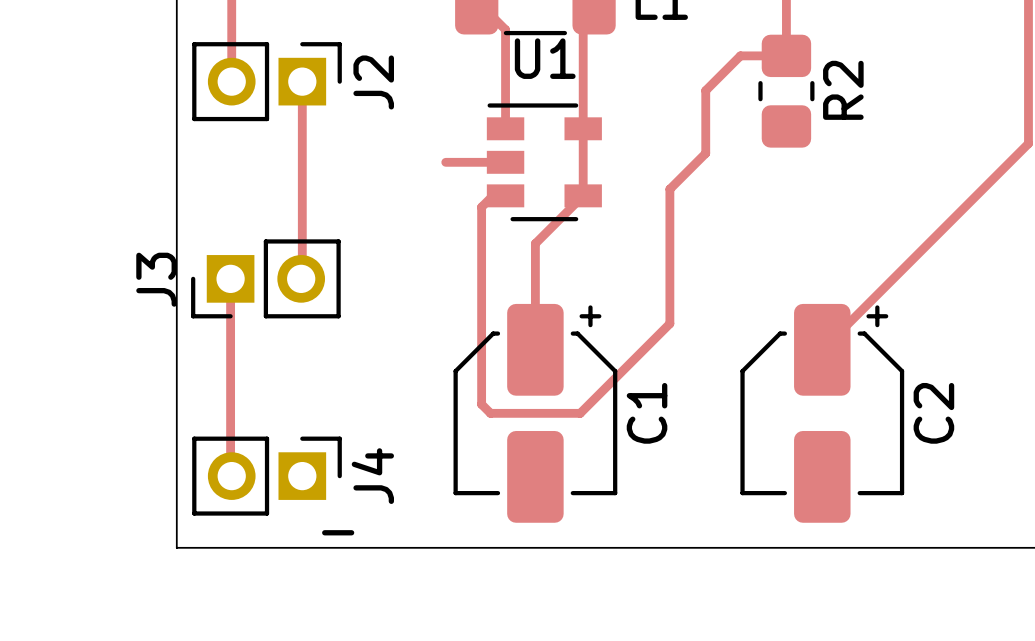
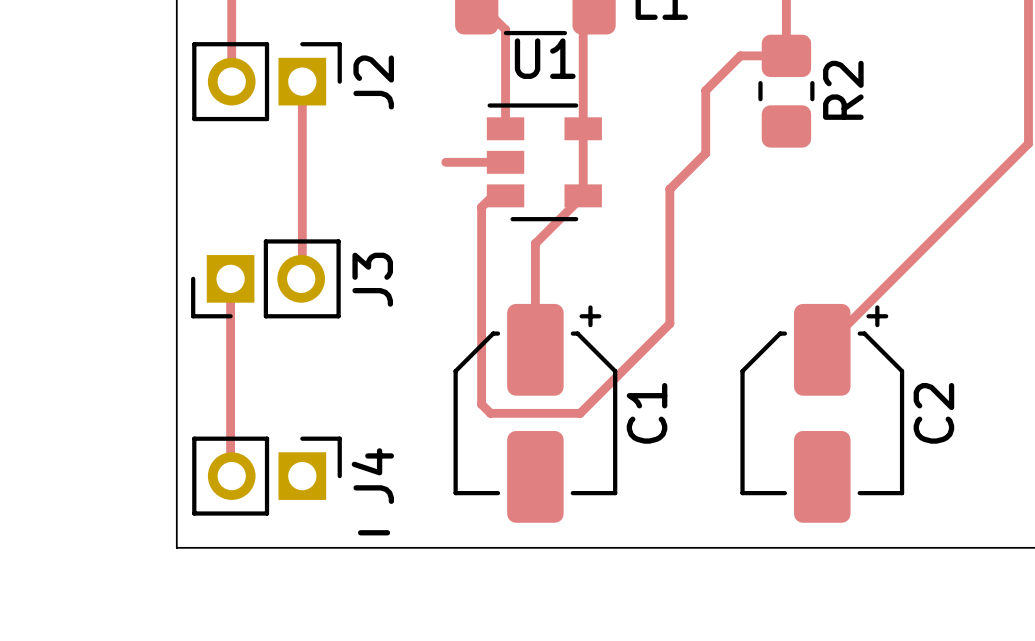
J3 name position: J3 (156, 279) -> J3 (372, 279)
text position: - (338, 532) -> - (374, 532)

